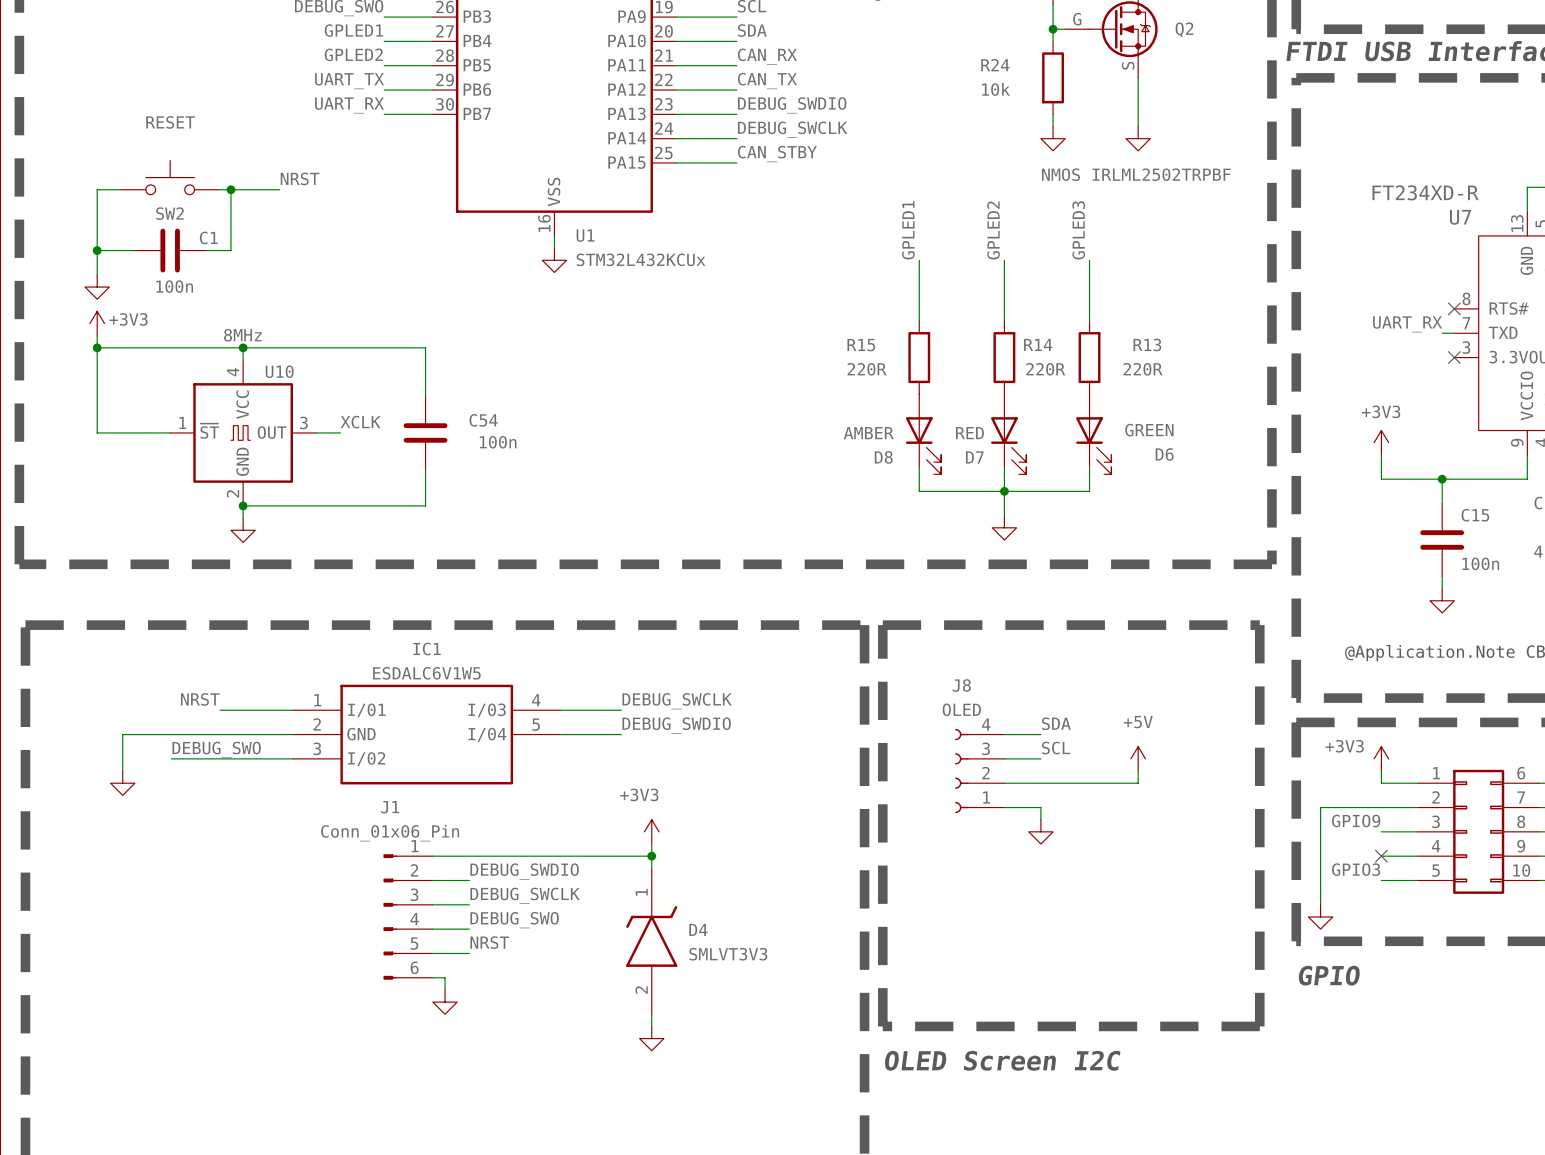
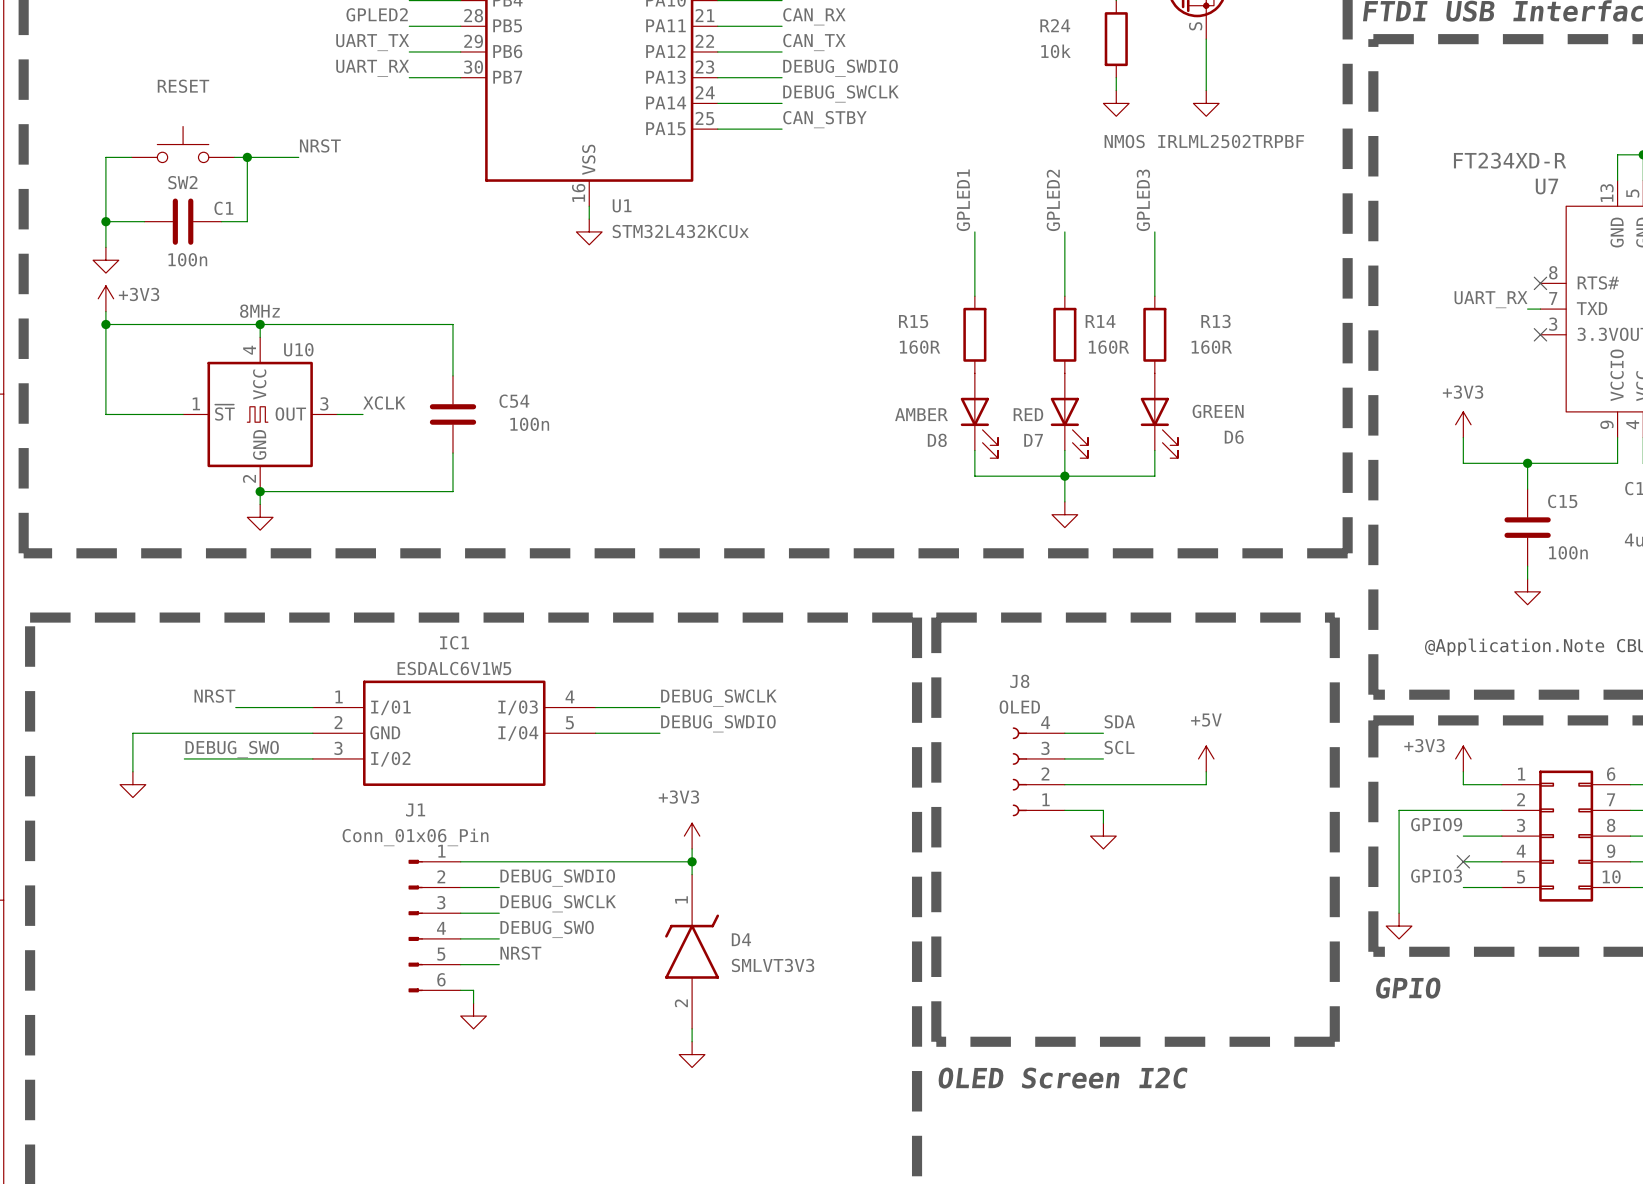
R15 value: 220R (867, 369) -> 160R (920, 347)
R14 value: 220R (1045, 369) -> 160R (1108, 347)
R13 value: 220R (1143, 369) -> 160R (1211, 347)

